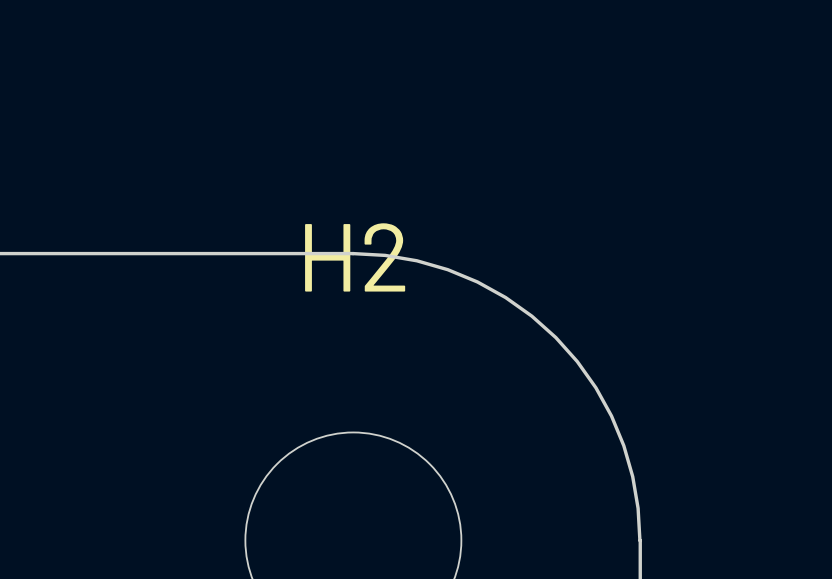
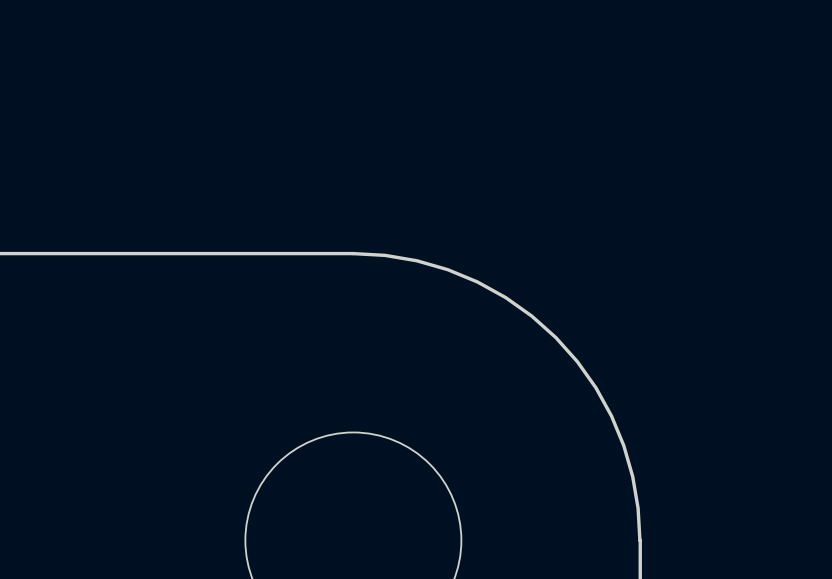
H2 name: H2 (355, 257) -> none

